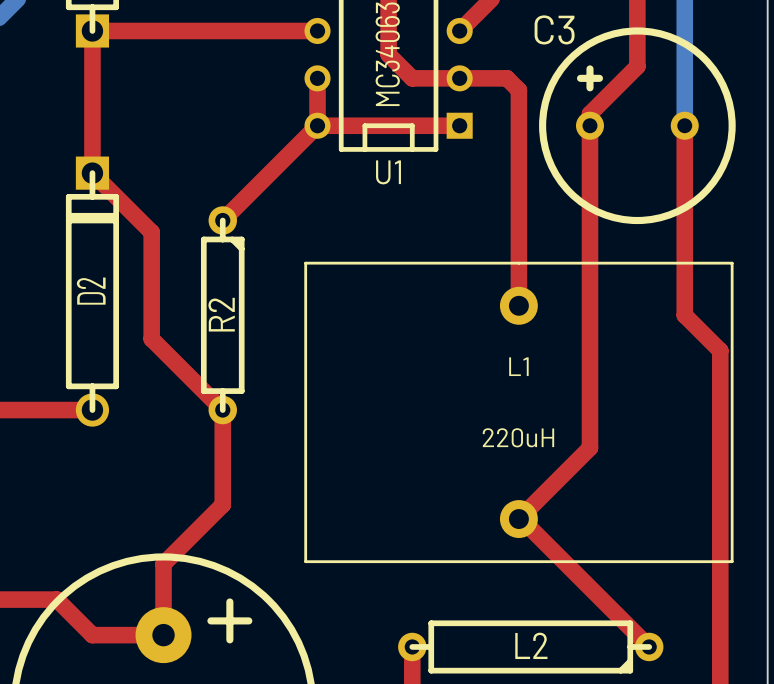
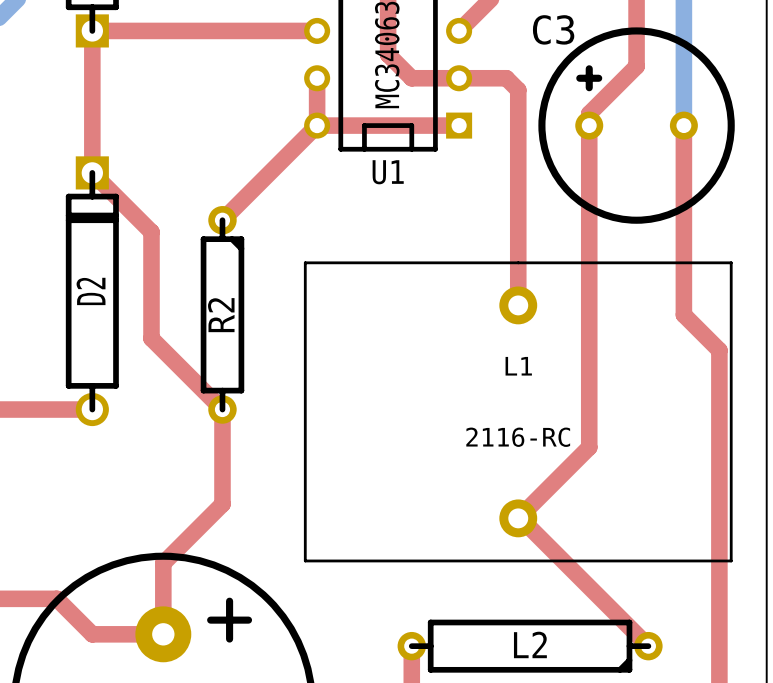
L1 value: 220uH (518, 437) -> 2116-RC (518, 437)

